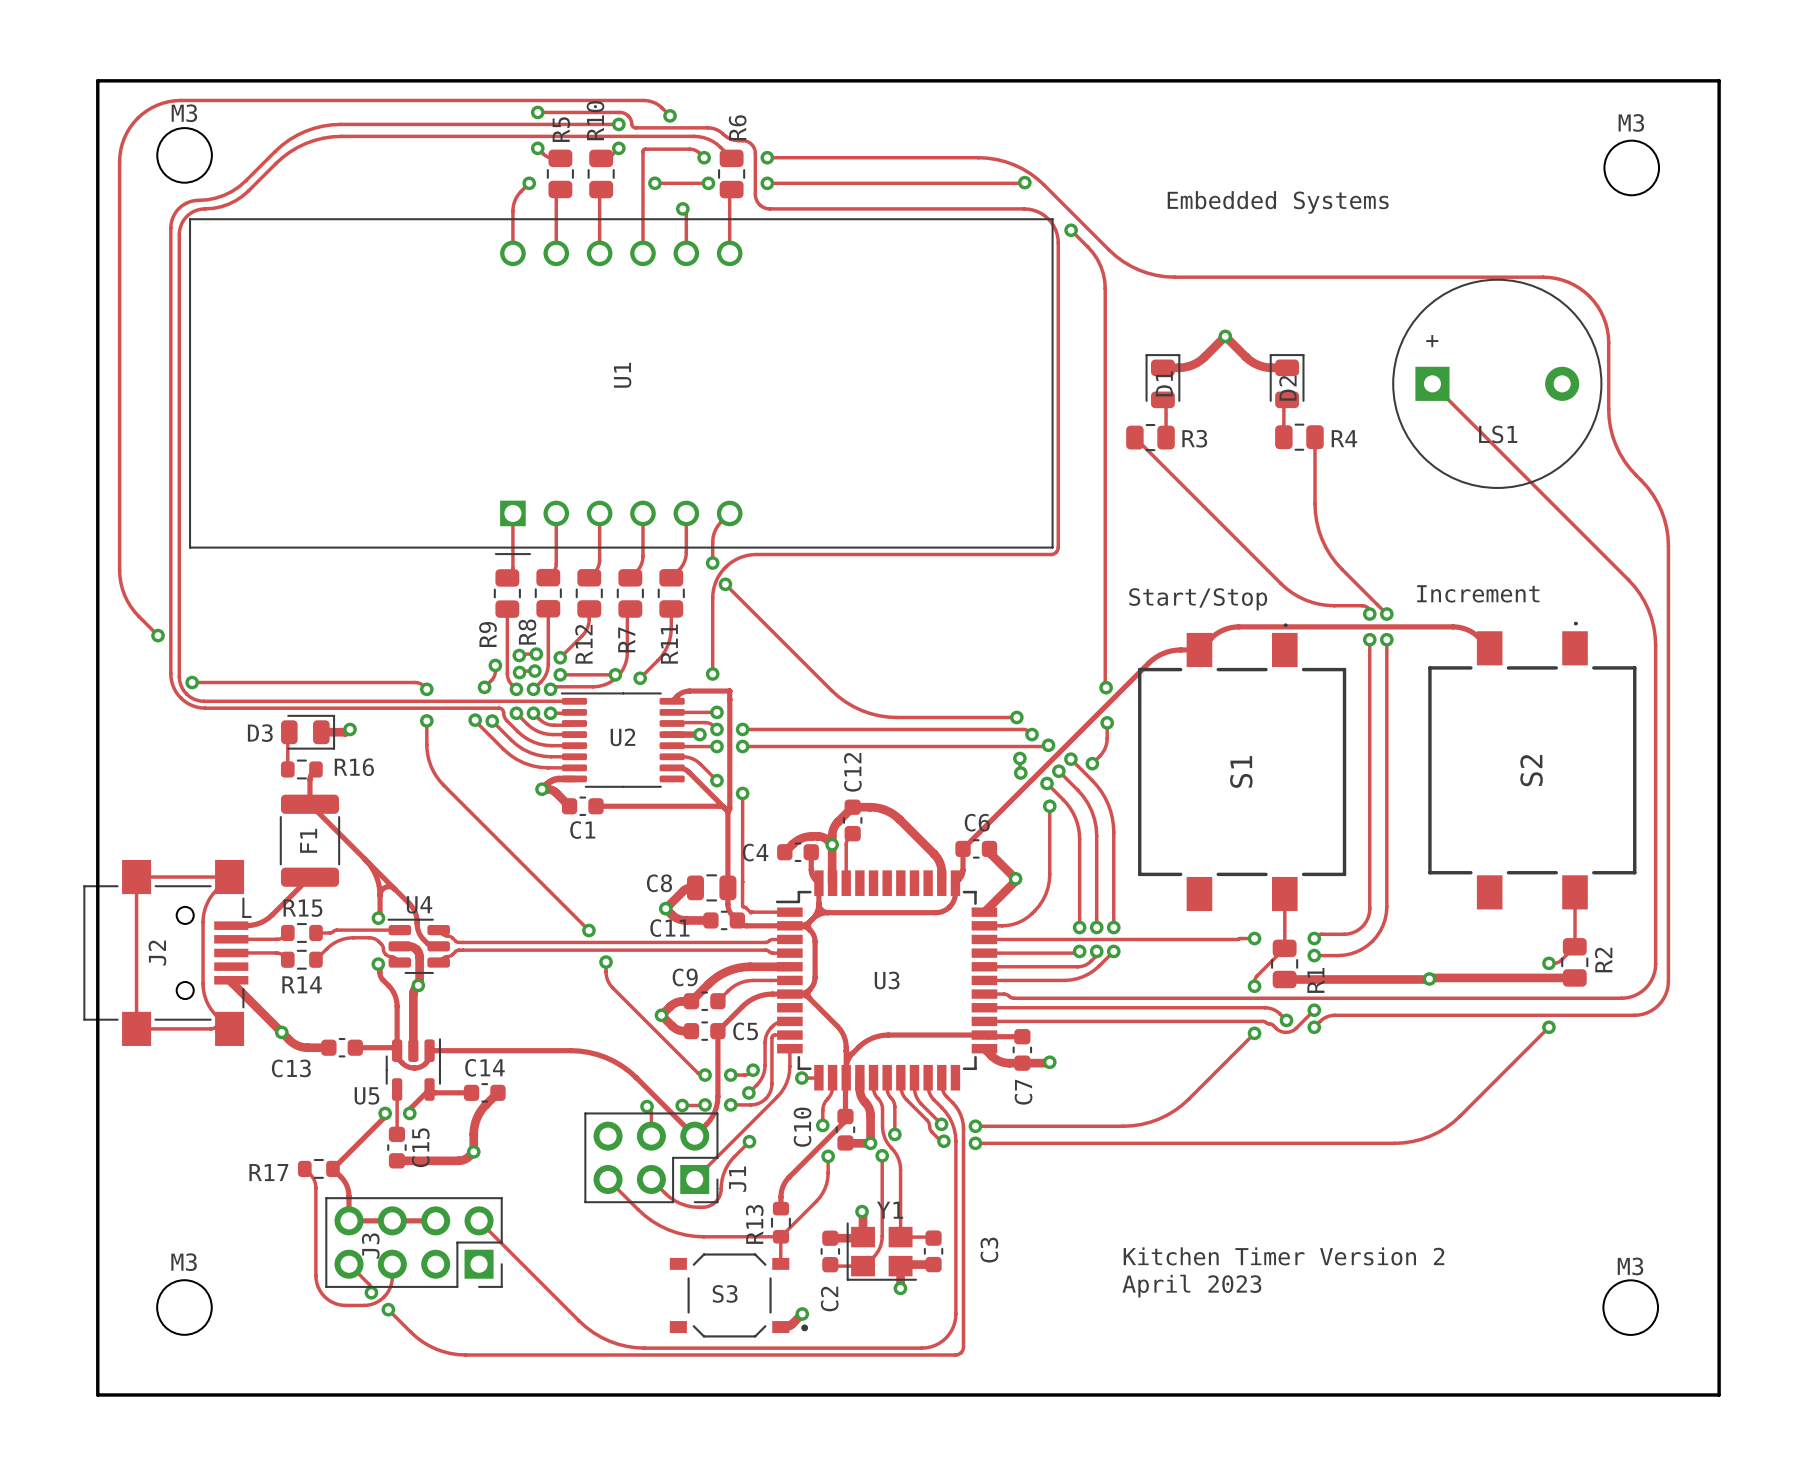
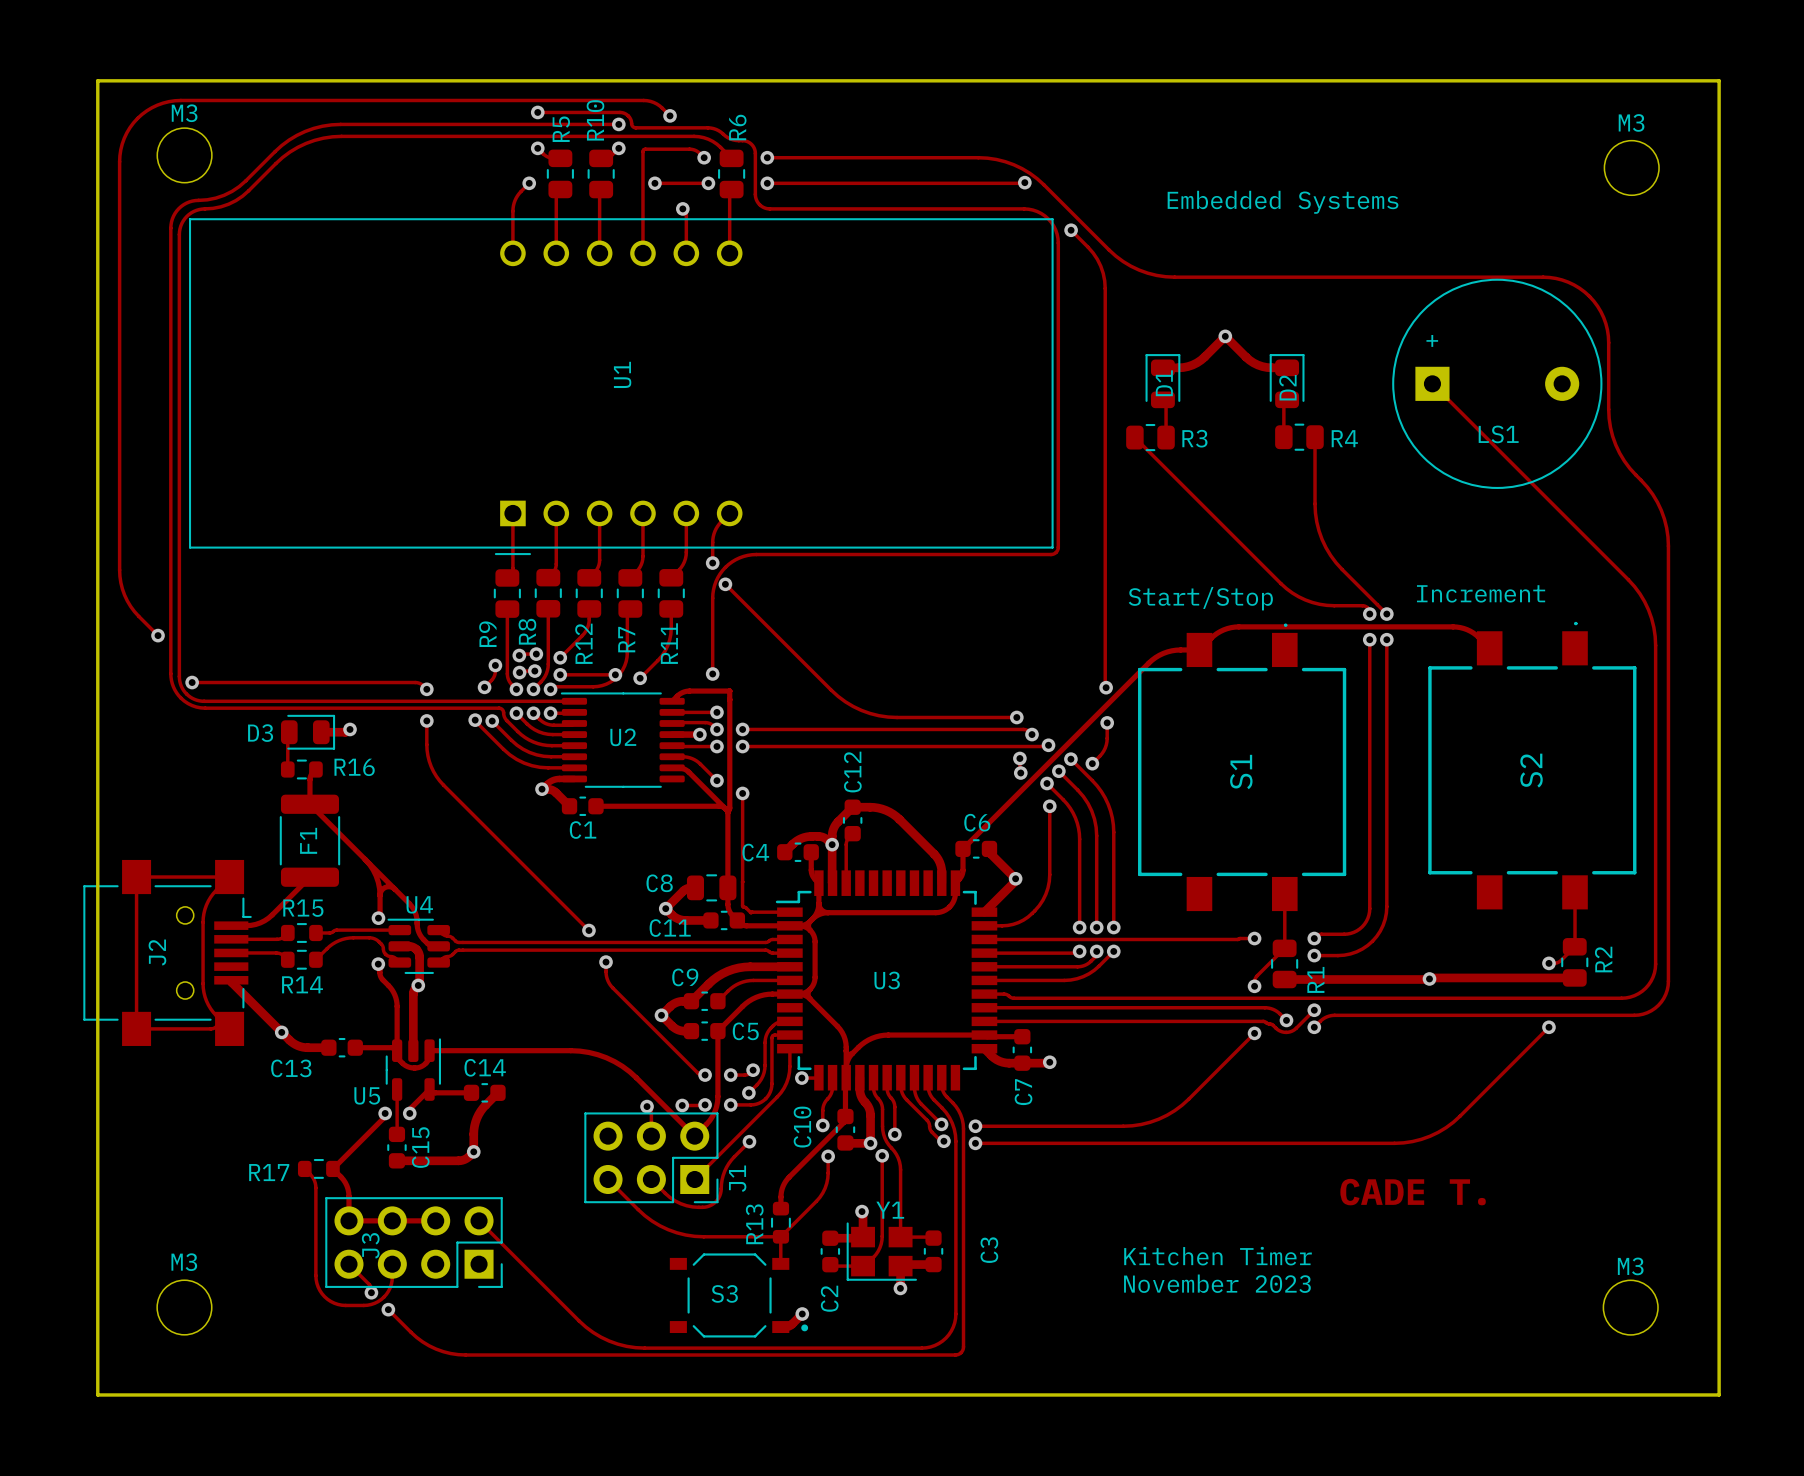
text: none -> CADE T. (1413, 1192)
text: Kitchen Timer Version 2 (1283, 1256) -> Kitchen Timer (1218, 1256)
text: April 2023 (1191, 1286) -> November 2023 (1217, 1283)

